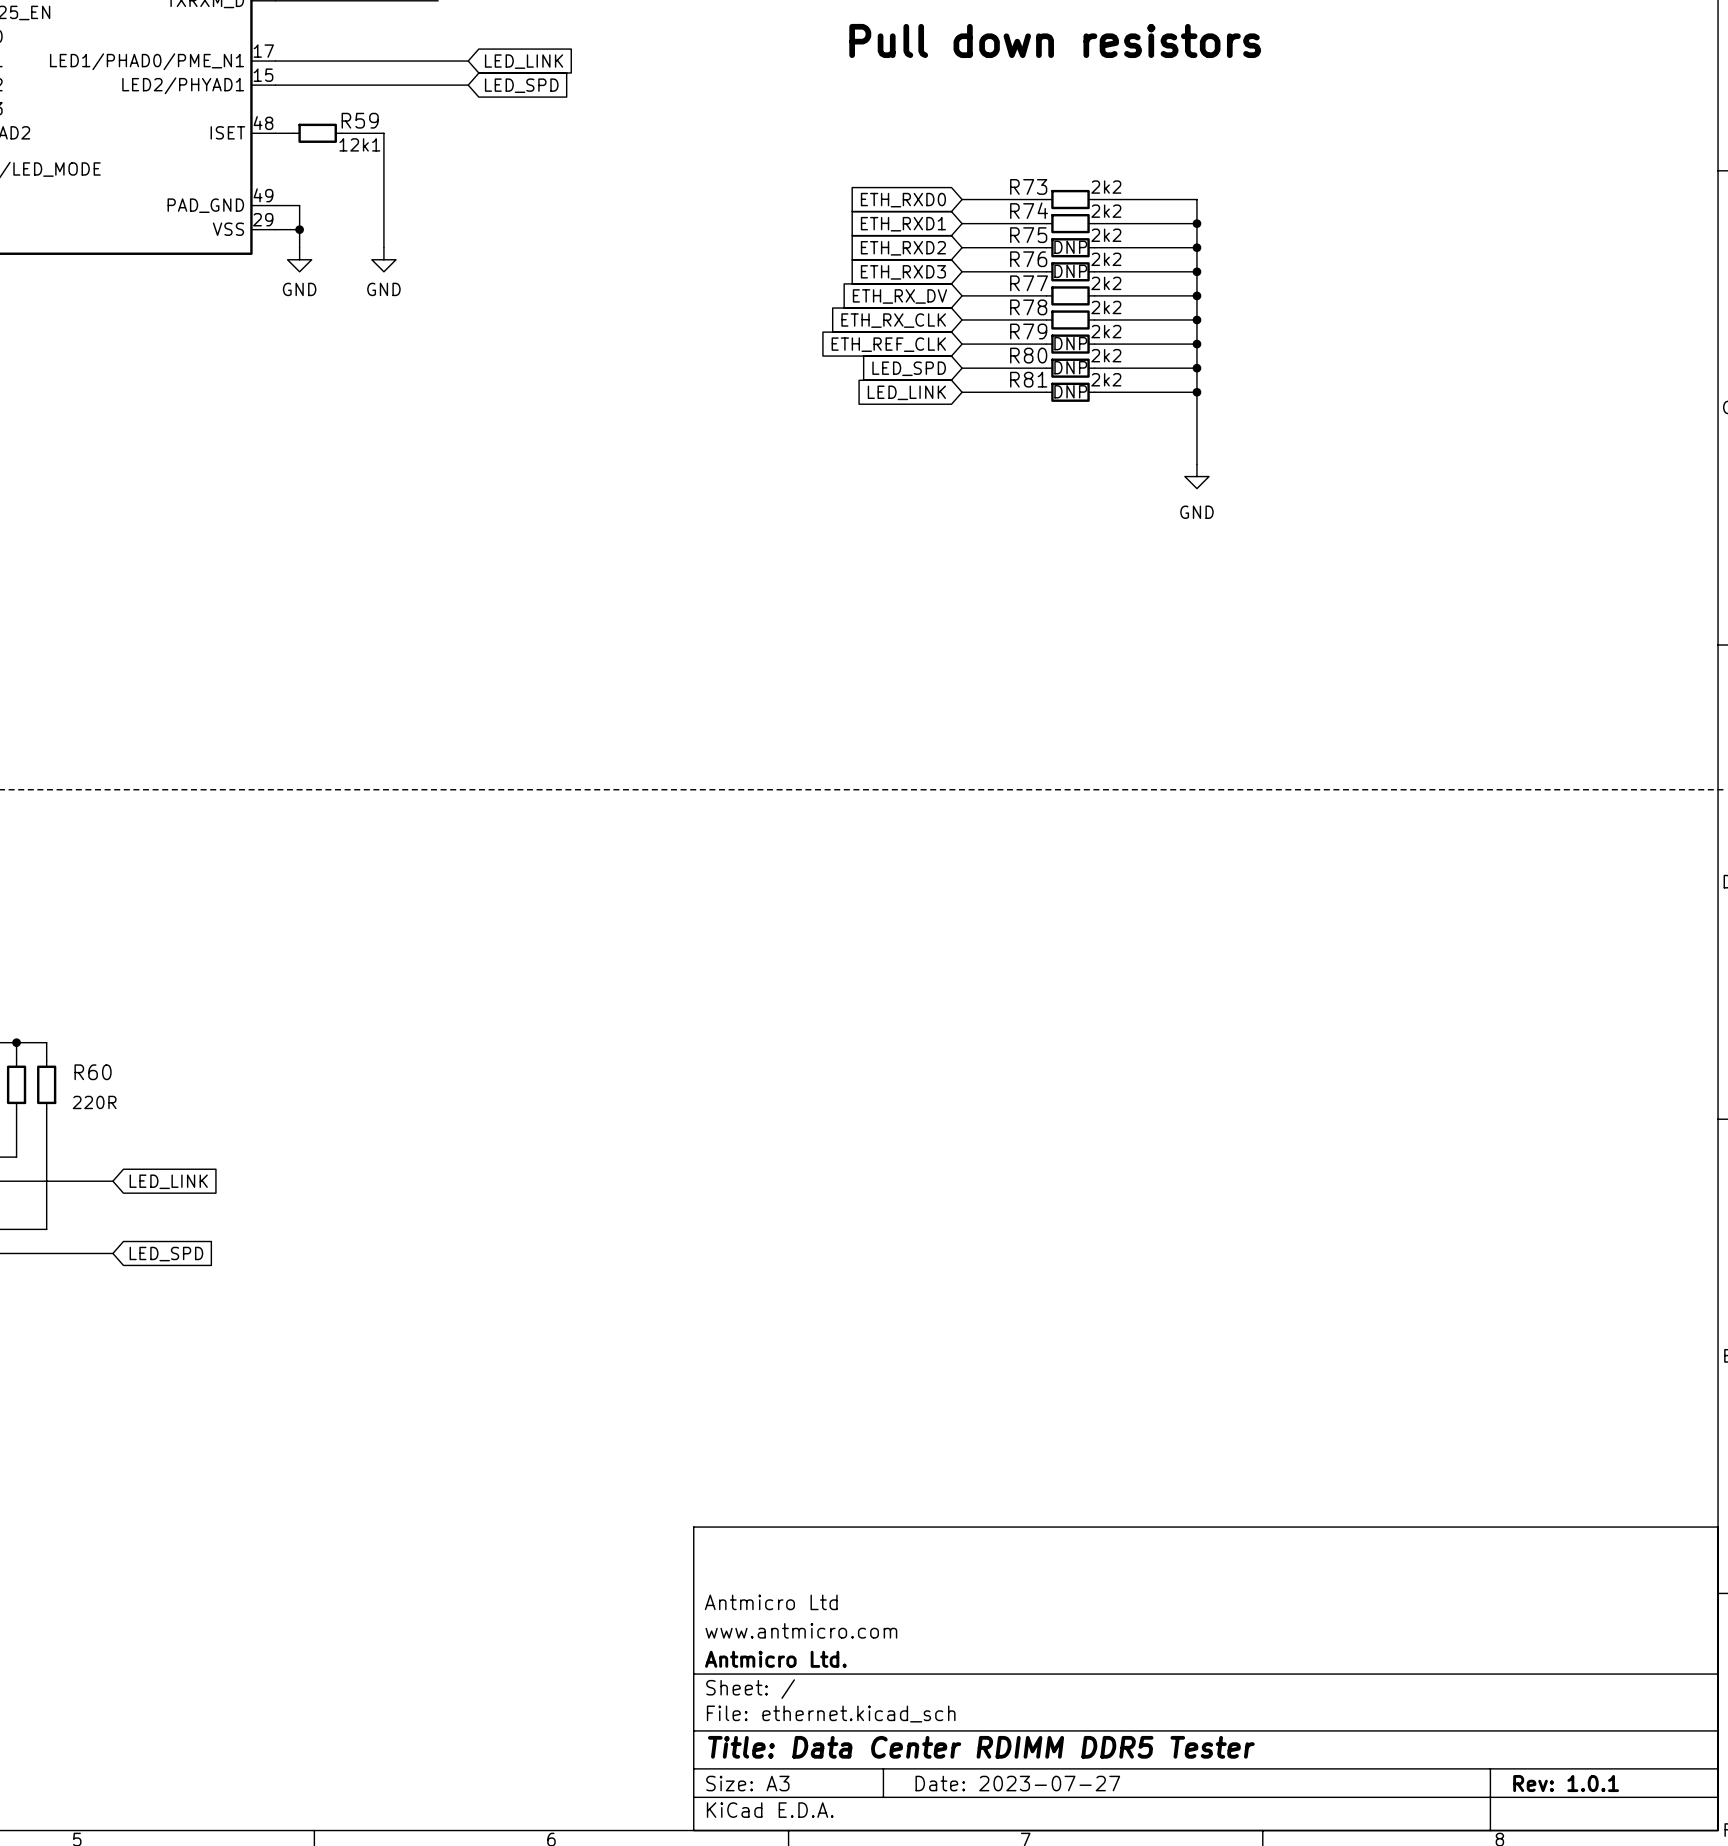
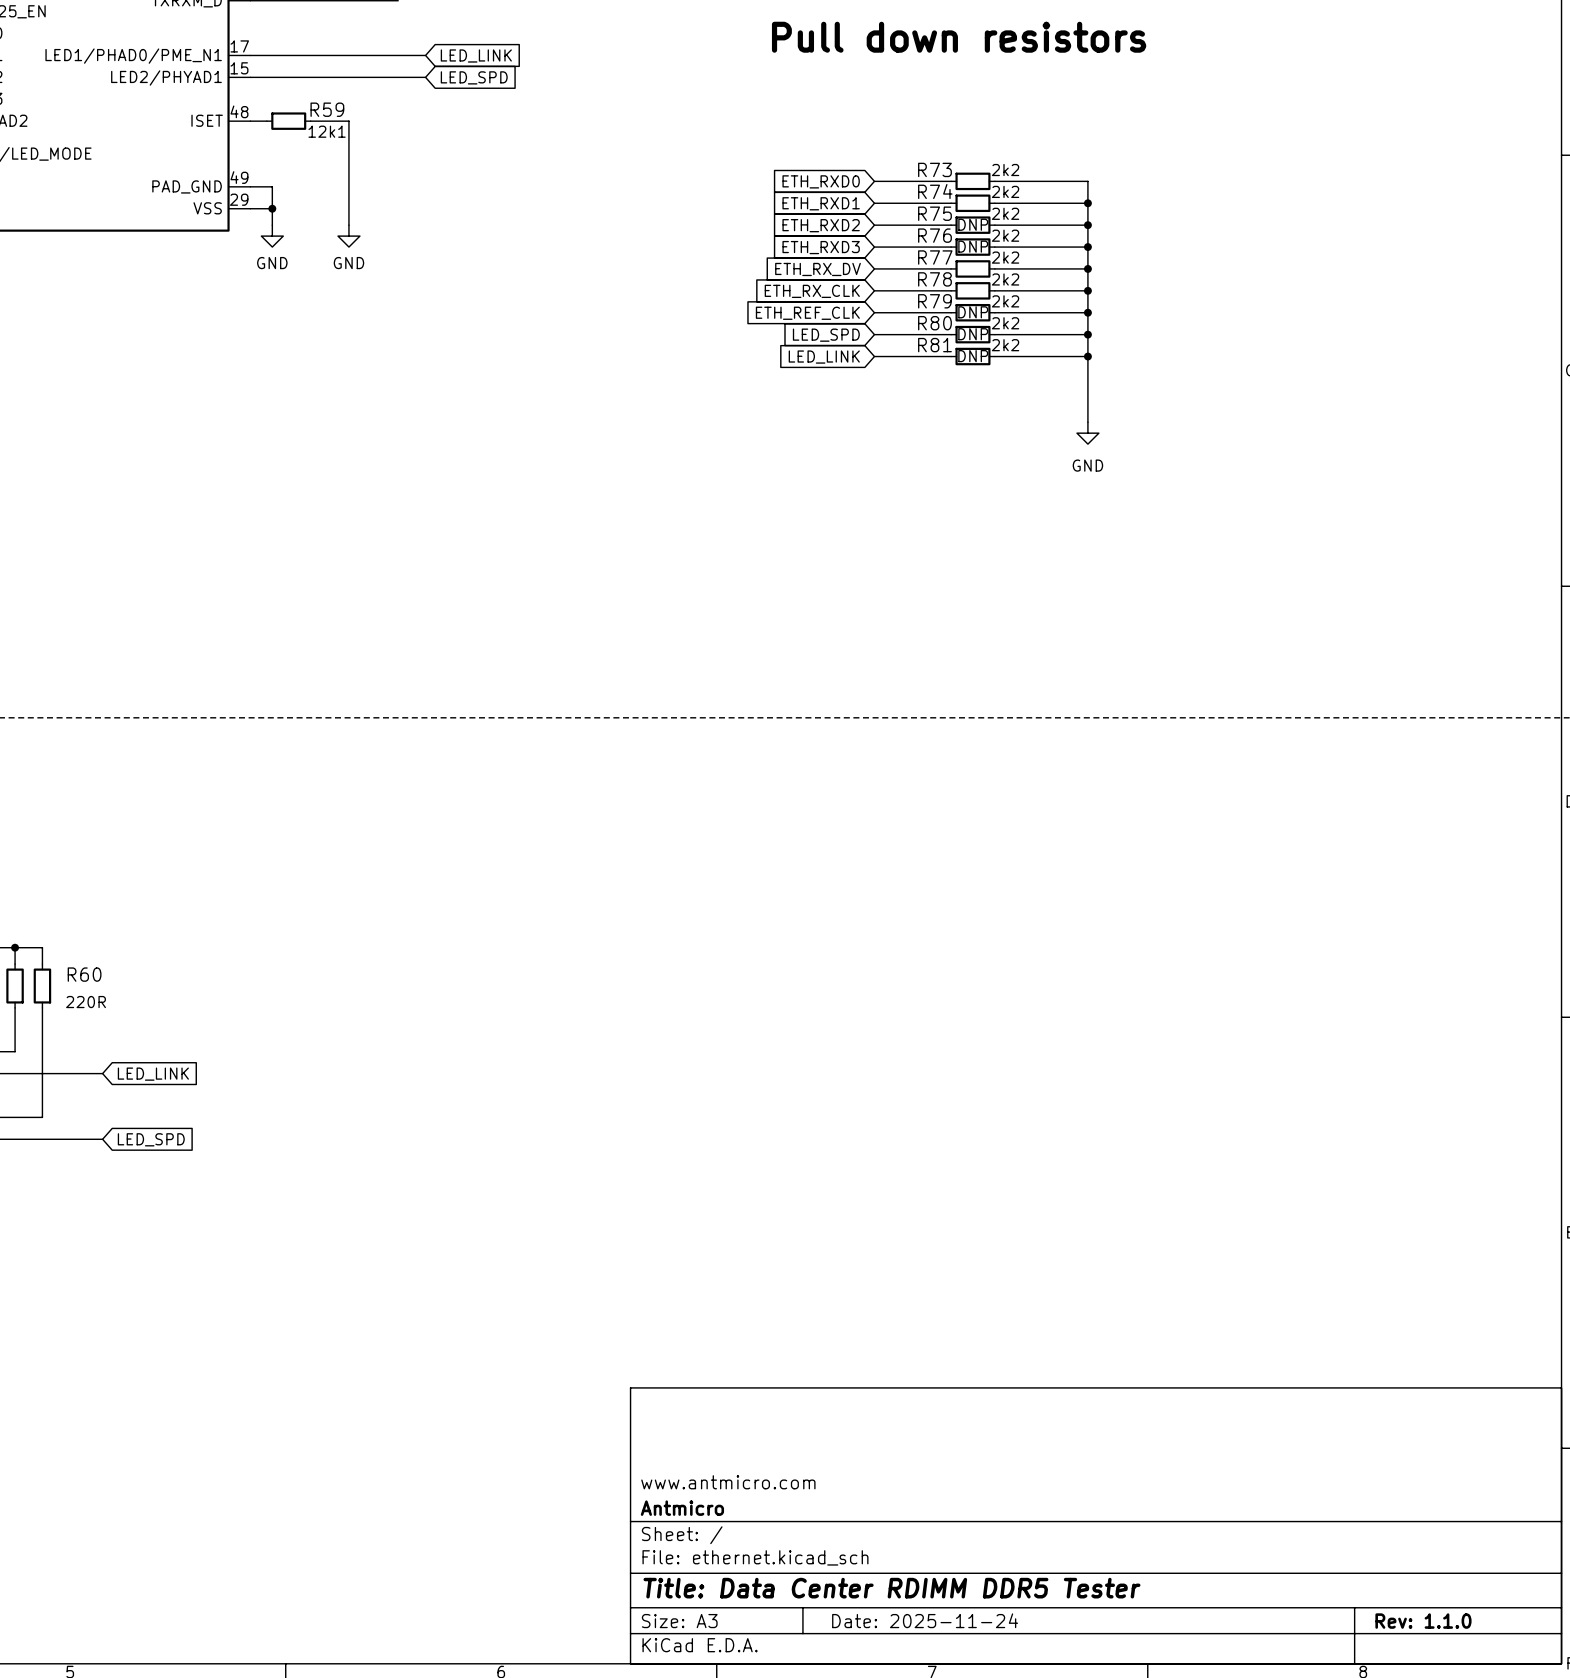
title block: Antmicro Ltd (771, 1602) -> none
title block: Antmicro Ltd. (775, 1659) -> Antmicro (682, 1508)
title block: Date: 2023-07-27 (1017, 1783) -> Date: 2025-11-24 (925, 1620)
title block: Rev: 1.0.1 (1566, 1783) -> Rev: 1.1.0 (1423, 1621)

